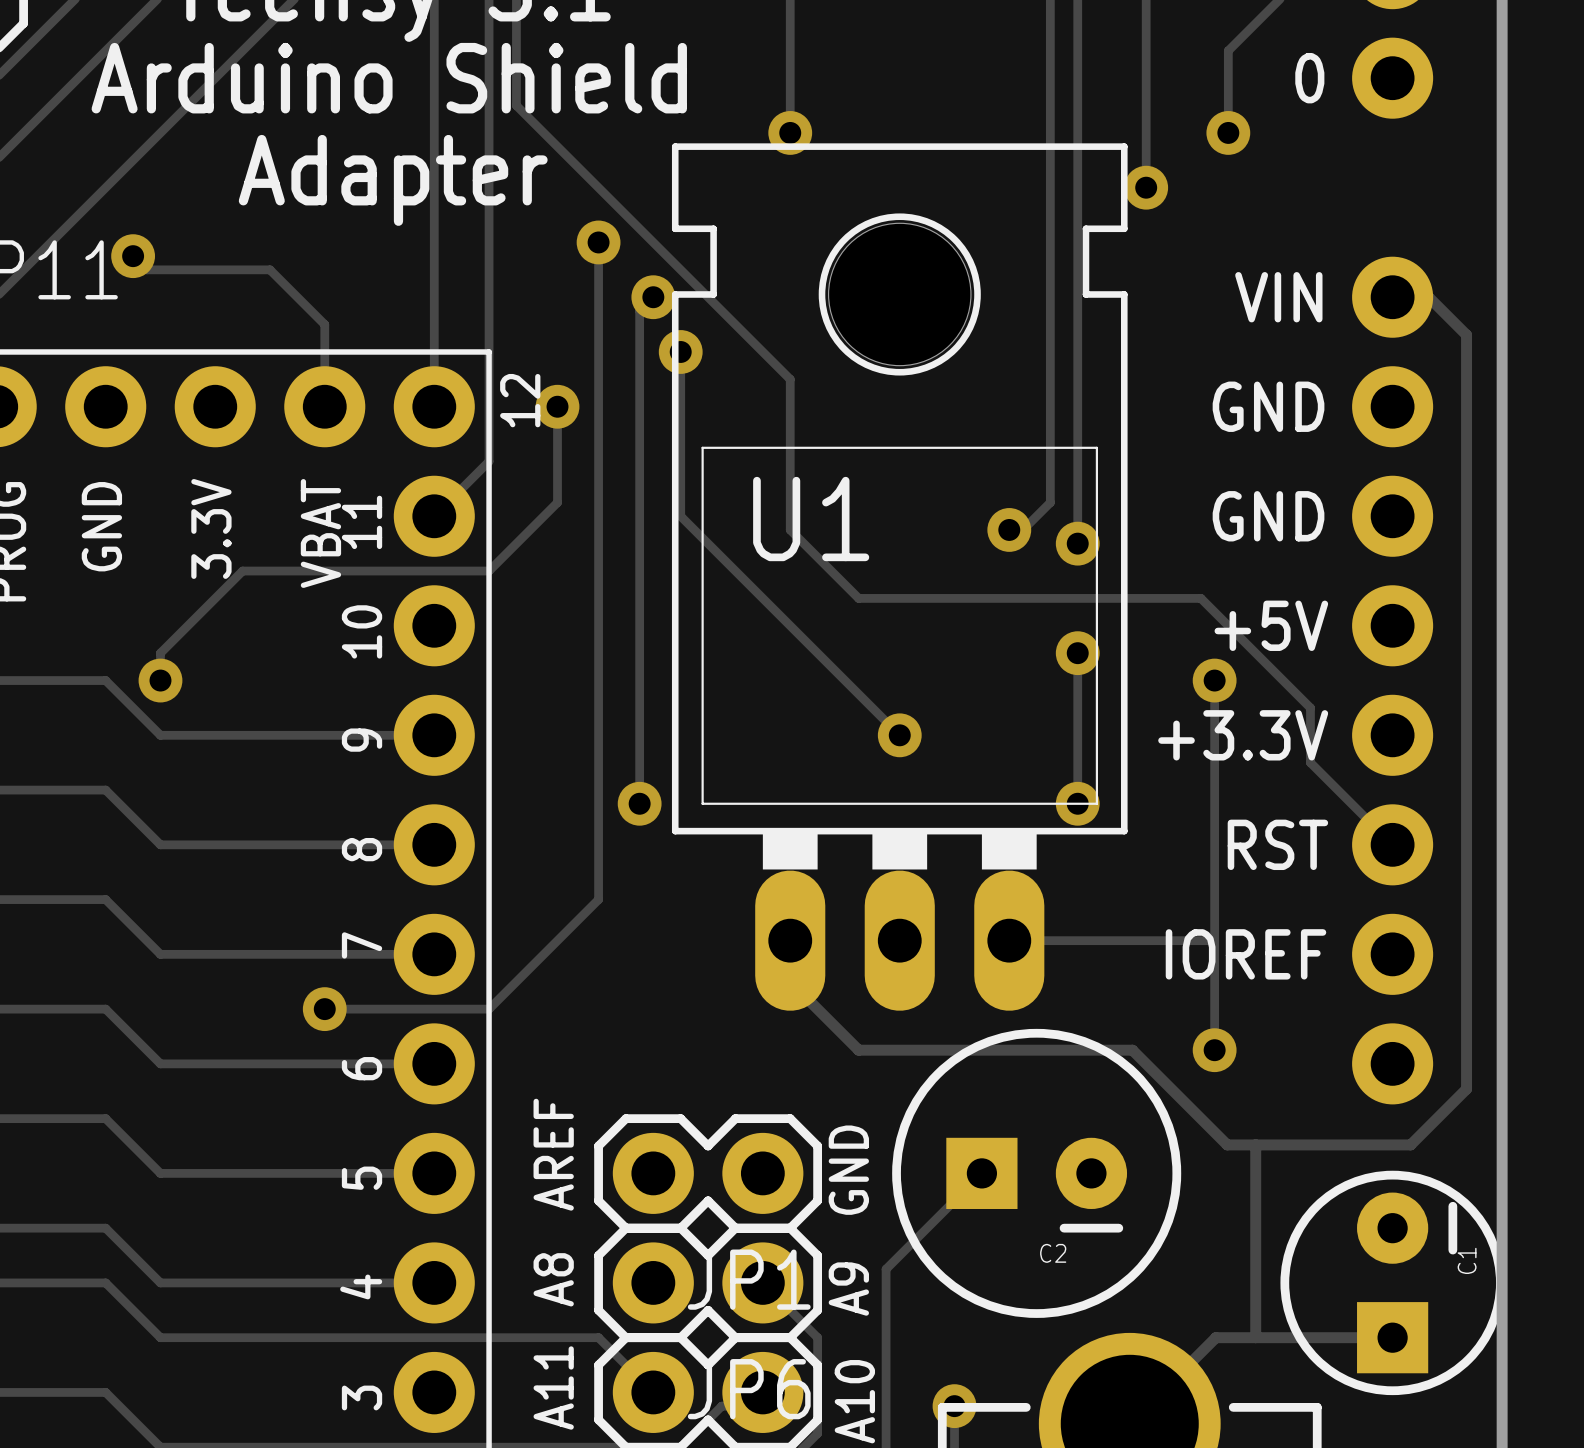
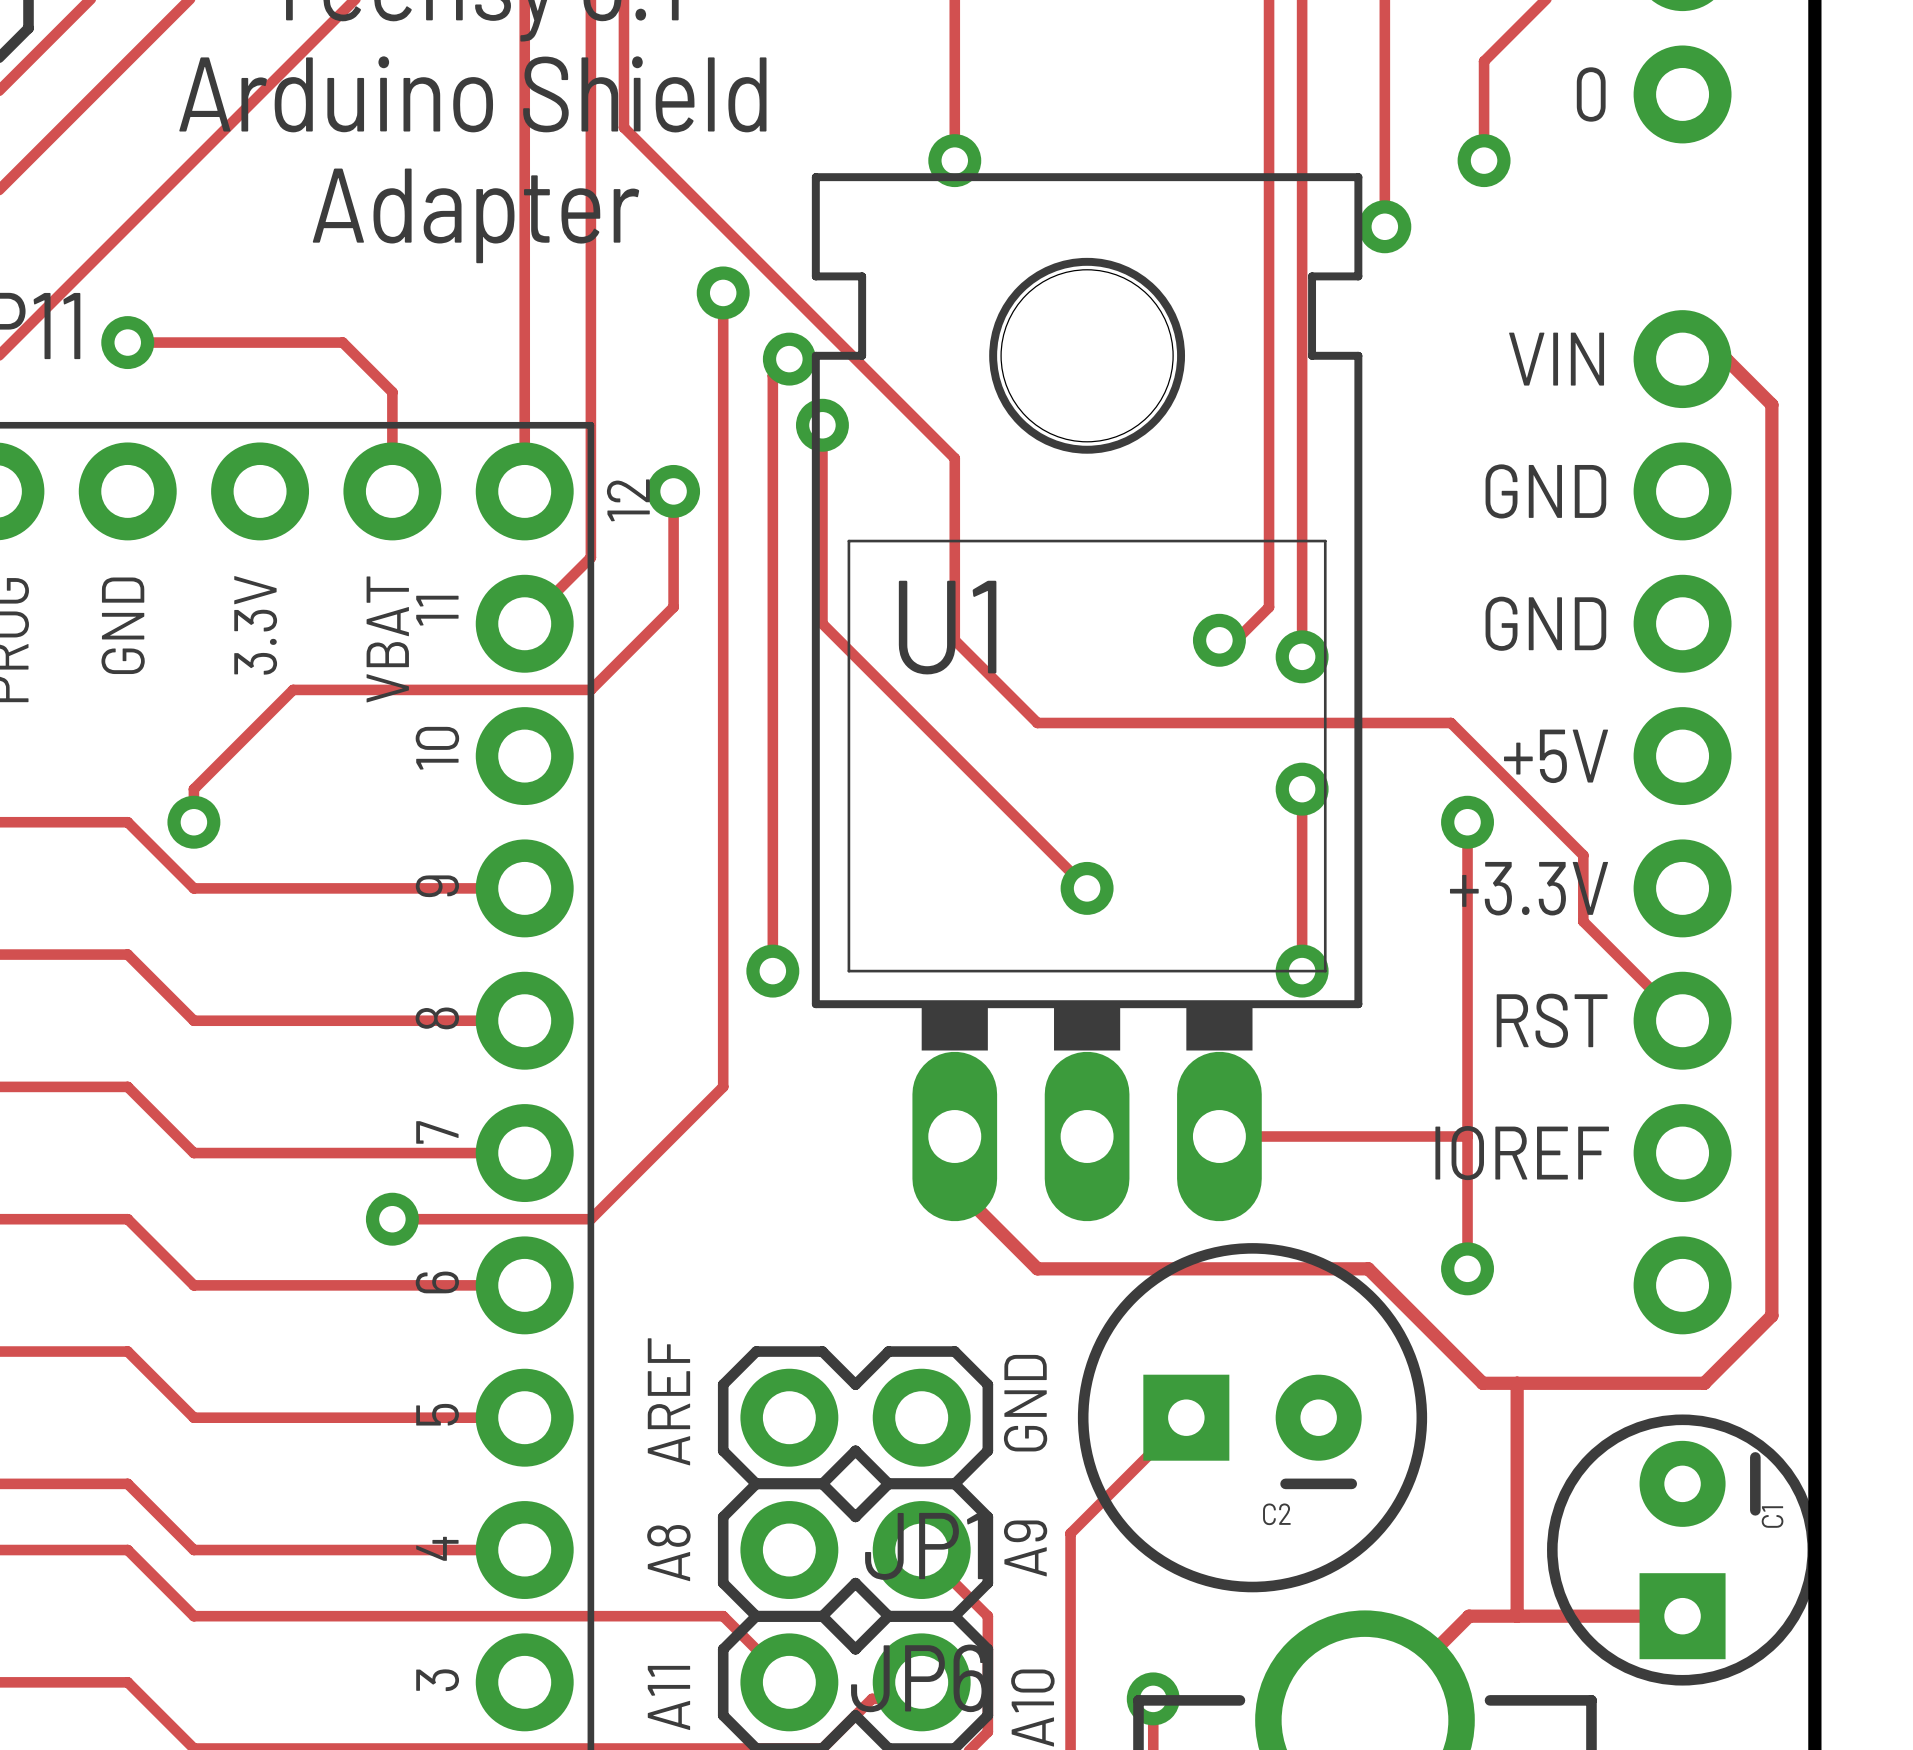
track: (133, 256) (146, 269) (270, 269) (283, 283) -> (127, 342) (342, 342)
via position: (133, 256) -> (127, 342)

